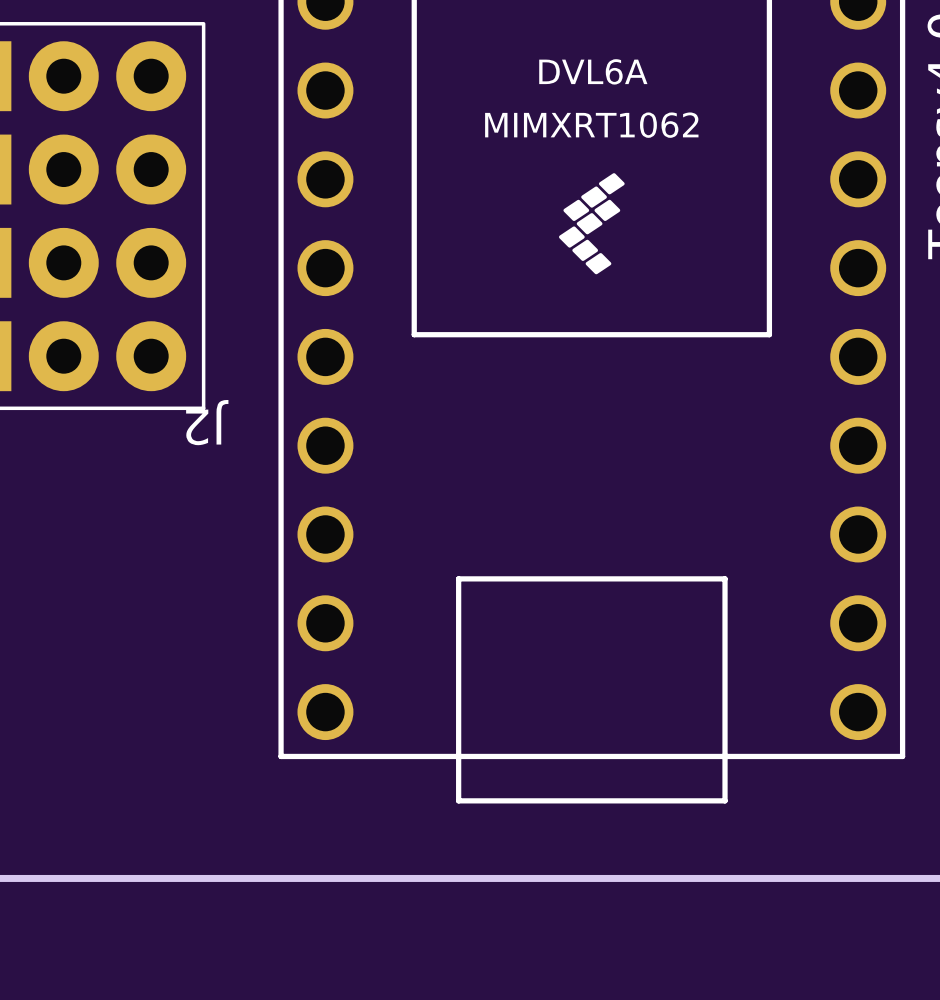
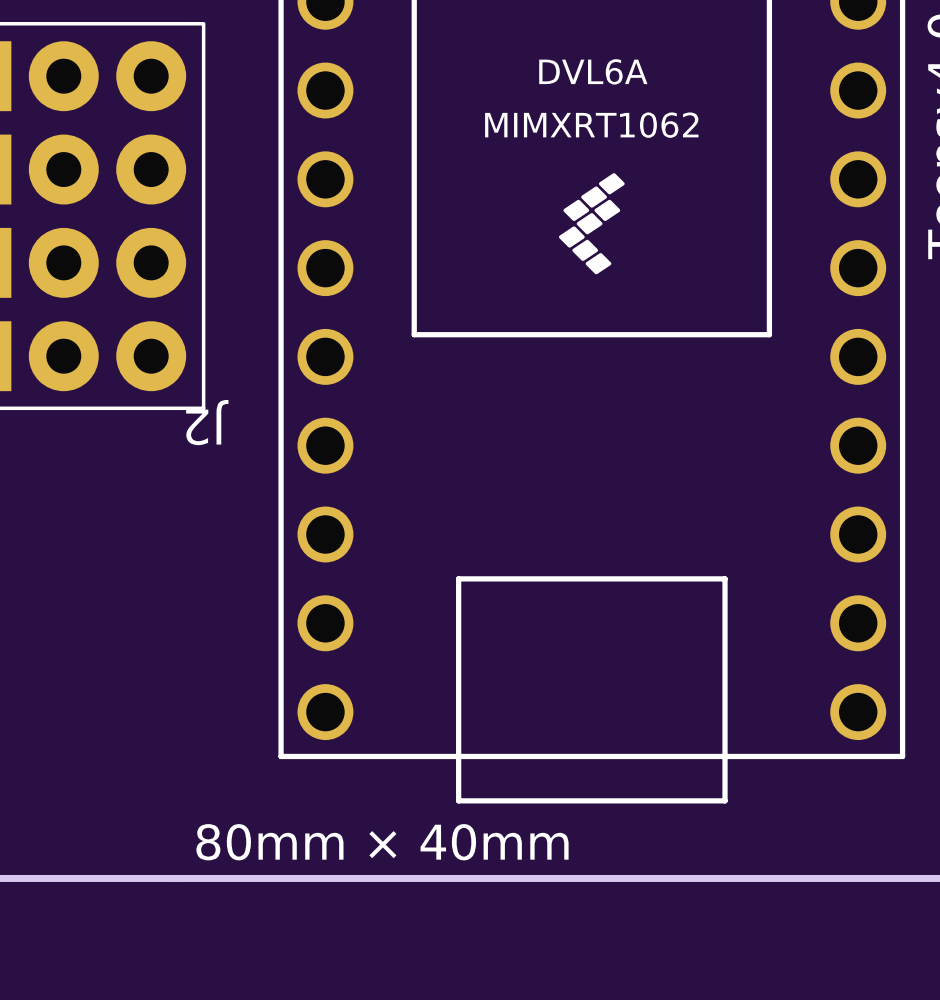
text: none -> 80mm × 40mm (382, 842)

